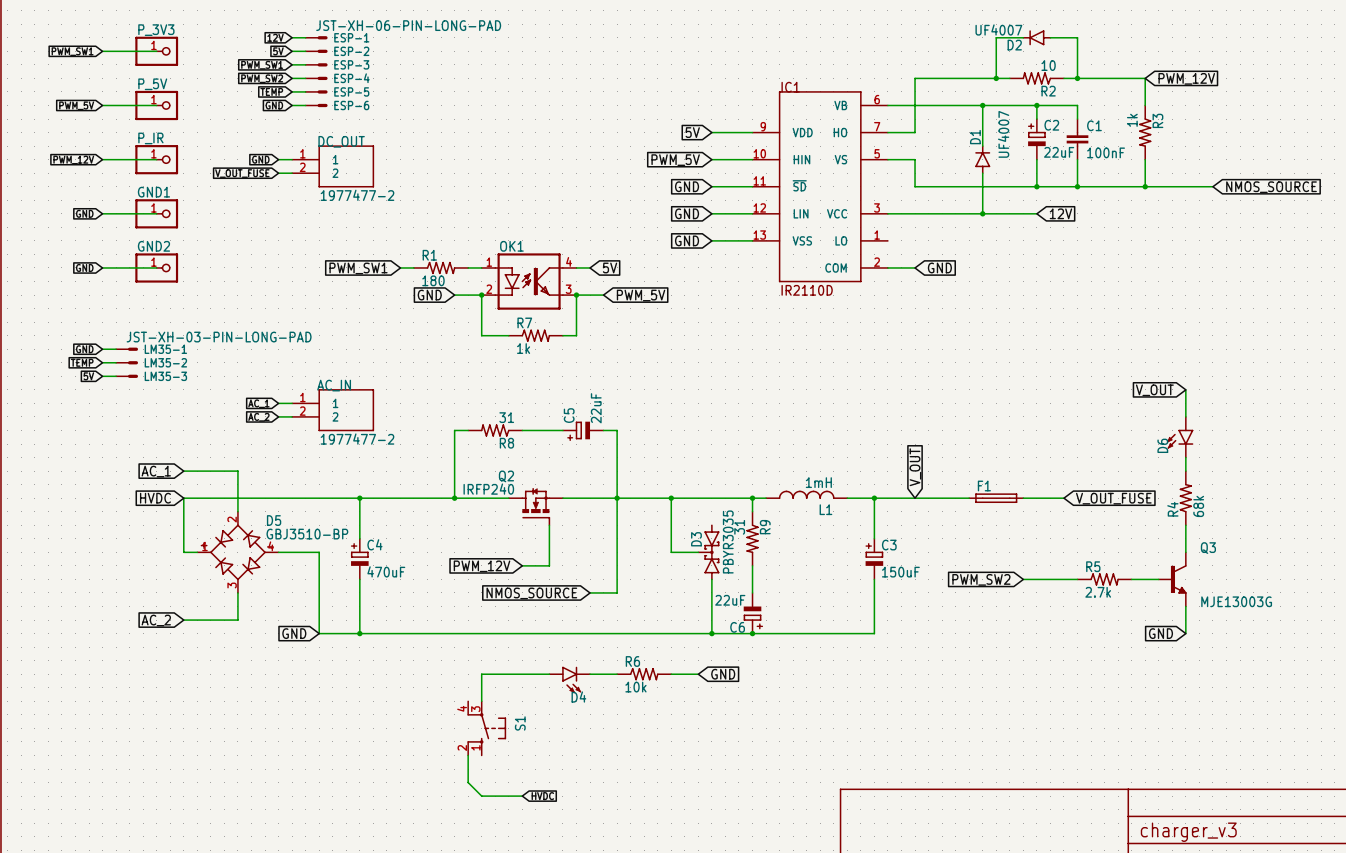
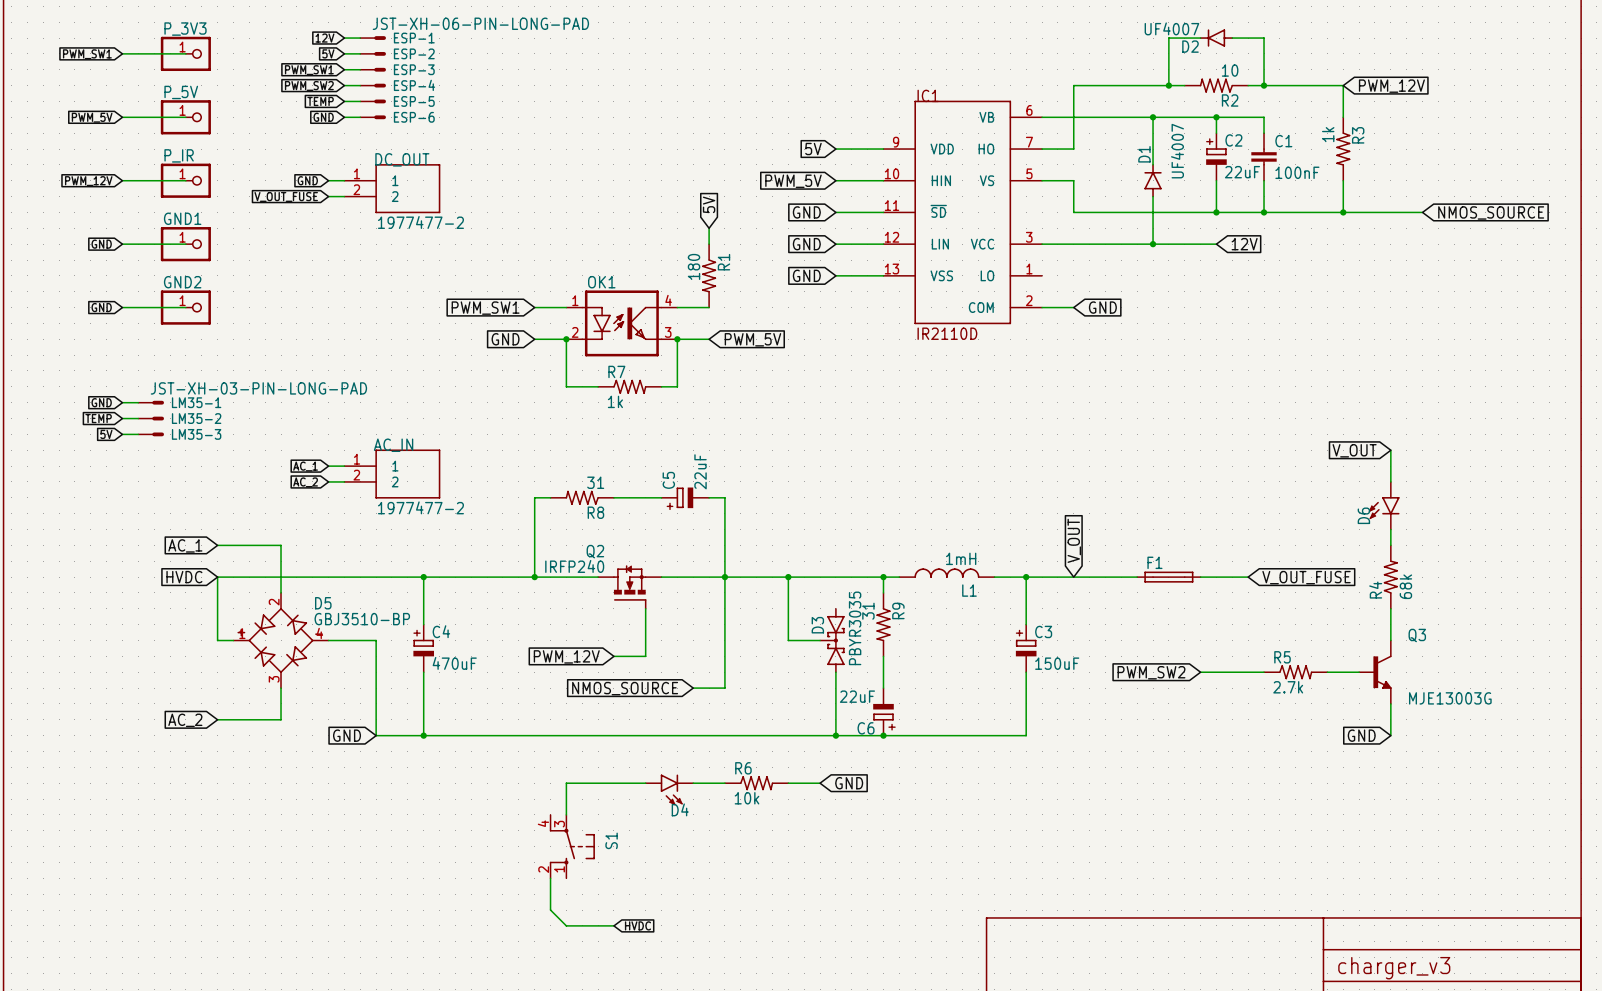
wire: none -> (709, 228) (709, 244)
R1 rotation: 0° (441, 267) -> 90° clockwise (709, 275)
R1 position: (441, 267) -> (709, 275)
wire: none -> (693, 307) (709, 307)
global label rotation: 0° (610, 267) -> 90° counterclockwise (709, 204)
global label position: 5V (610, 267) -> 5V (709, 204)
global label position: PWM_SW1 (358, 268) -> PWM_SW1 (485, 308)

